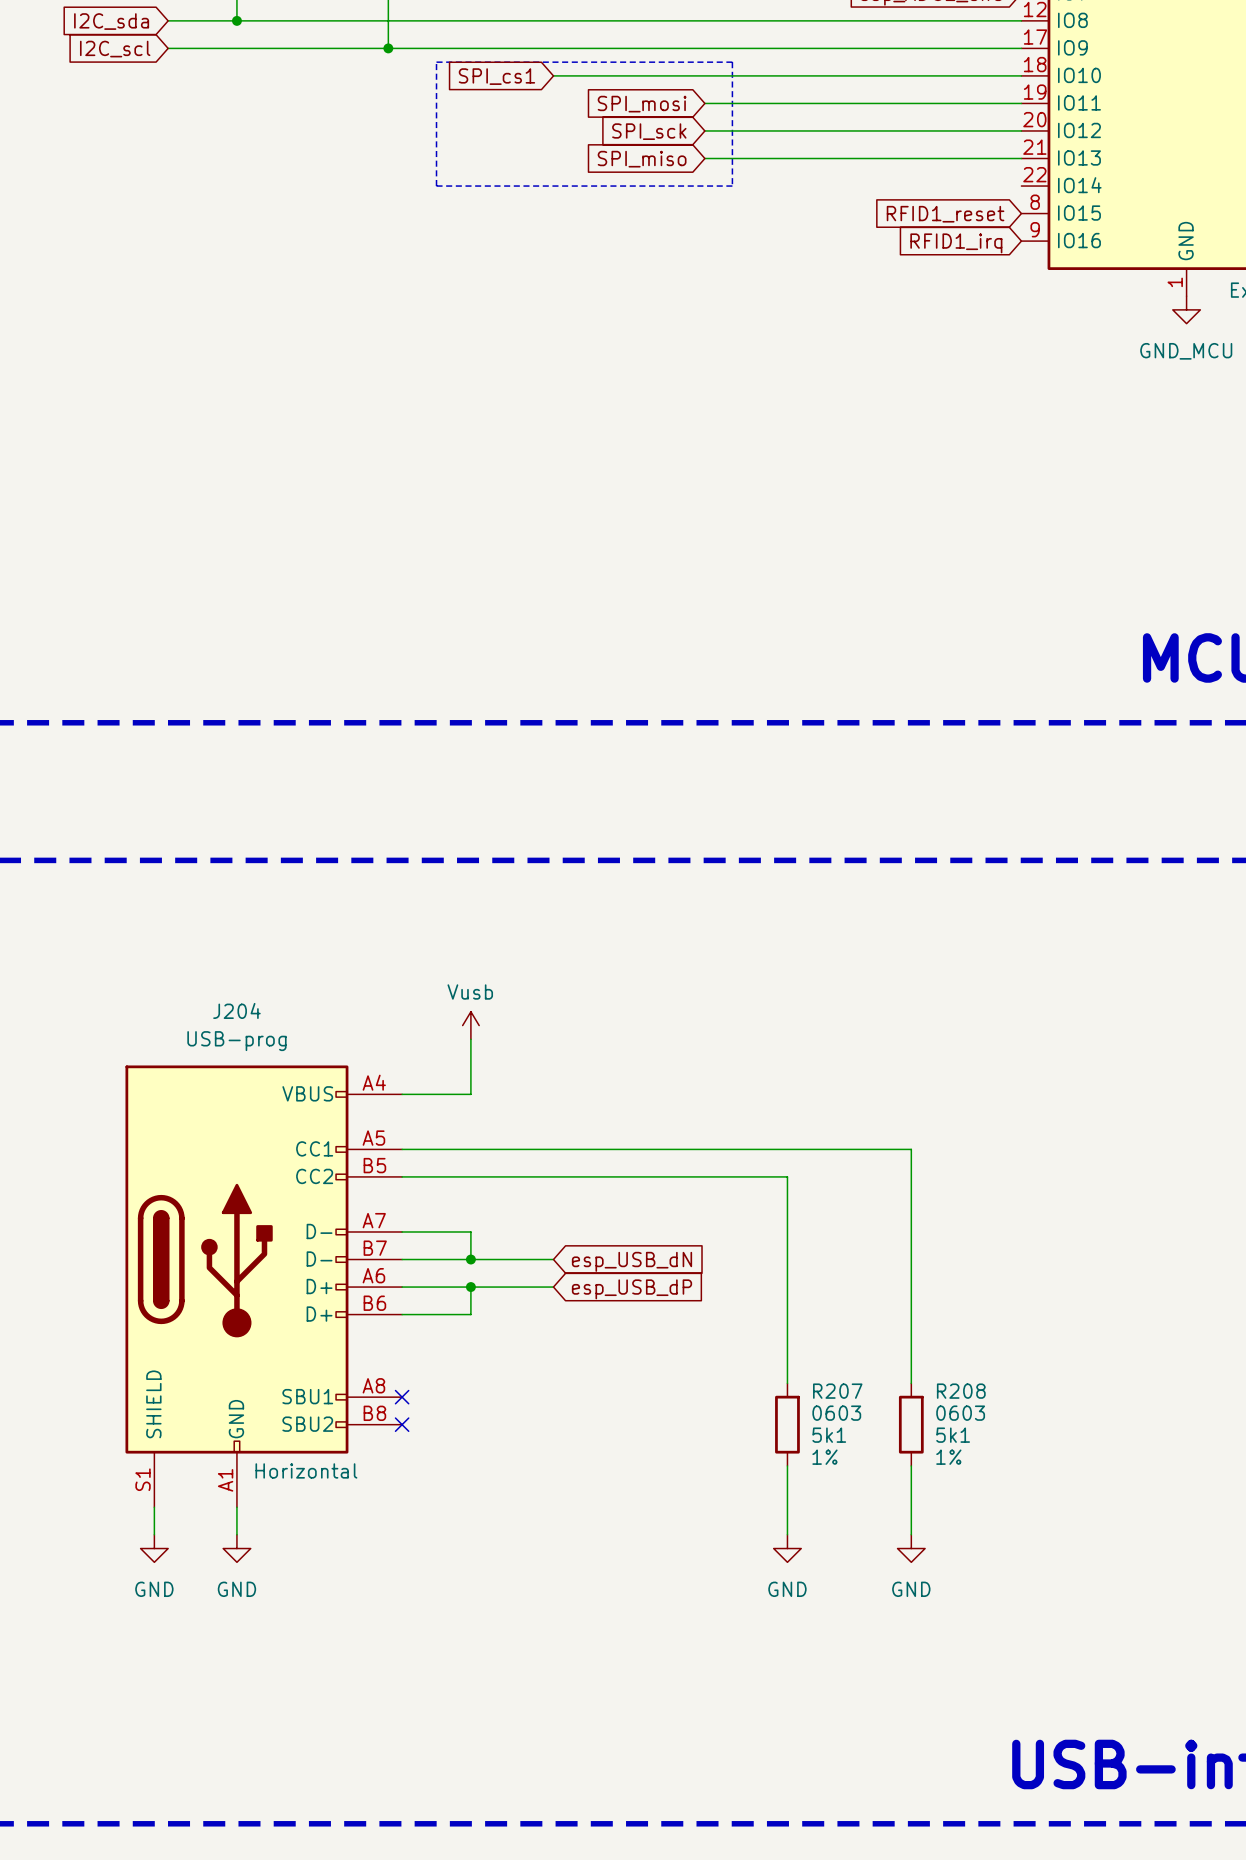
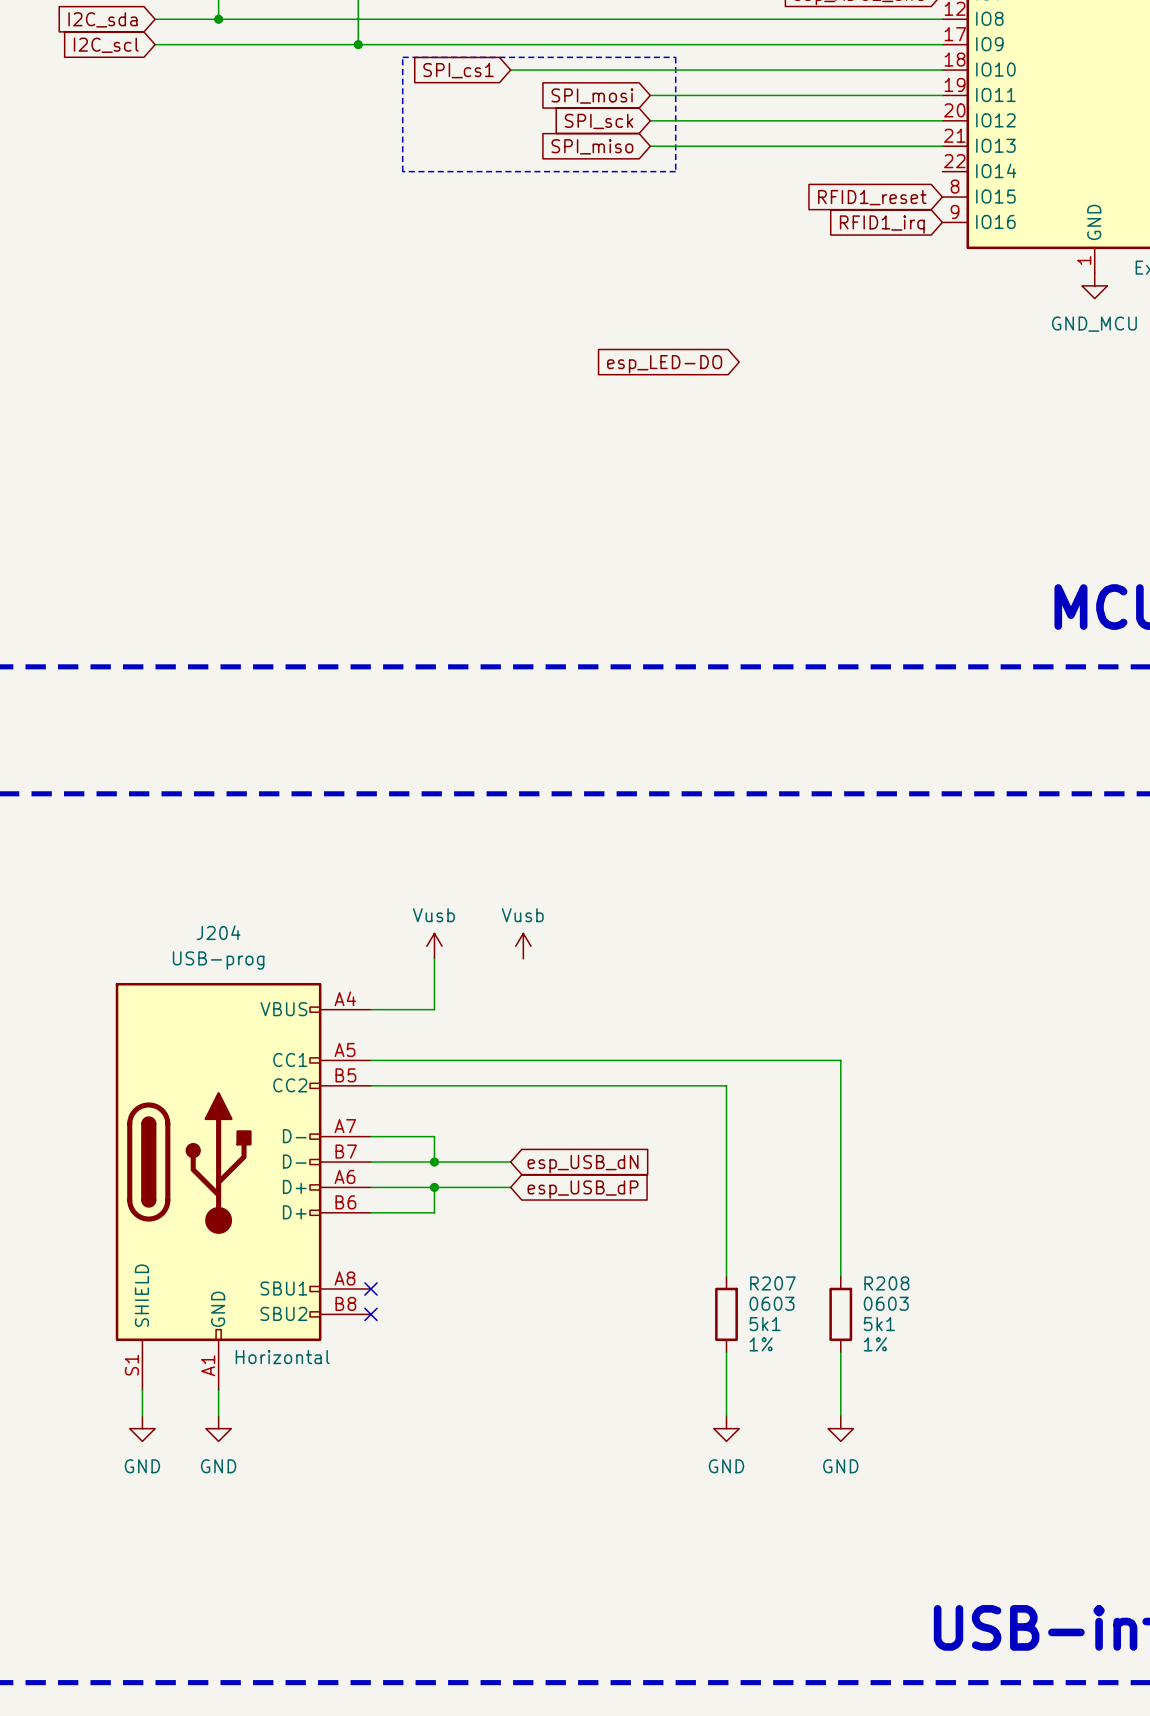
global label: none -> esp_LED-DO (664, 364)
power symbol: none -> Vusb (523, 946)

